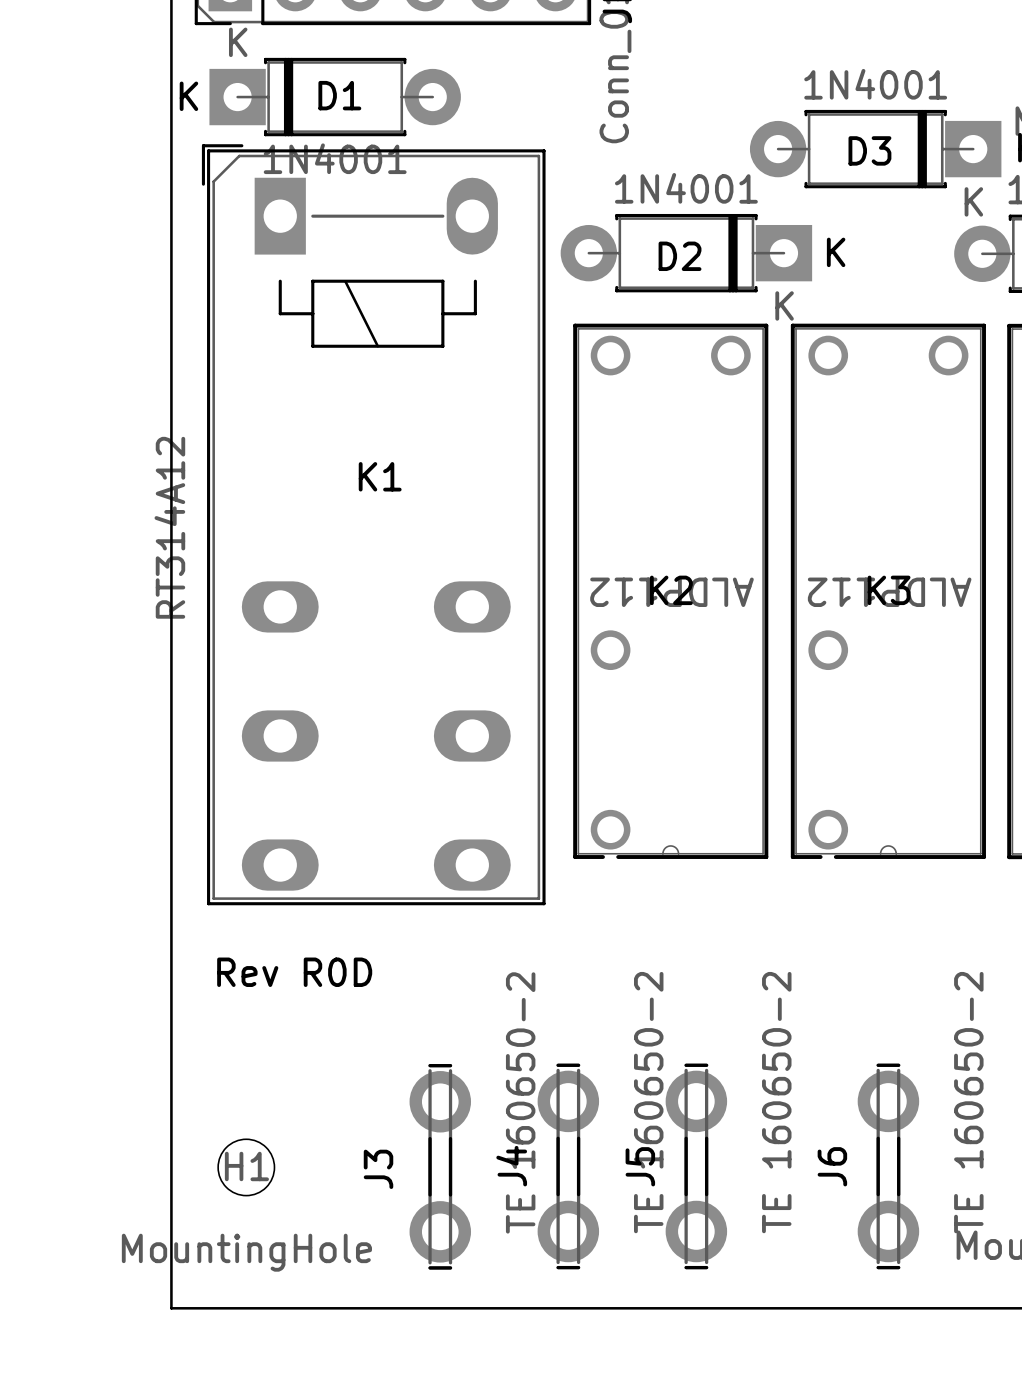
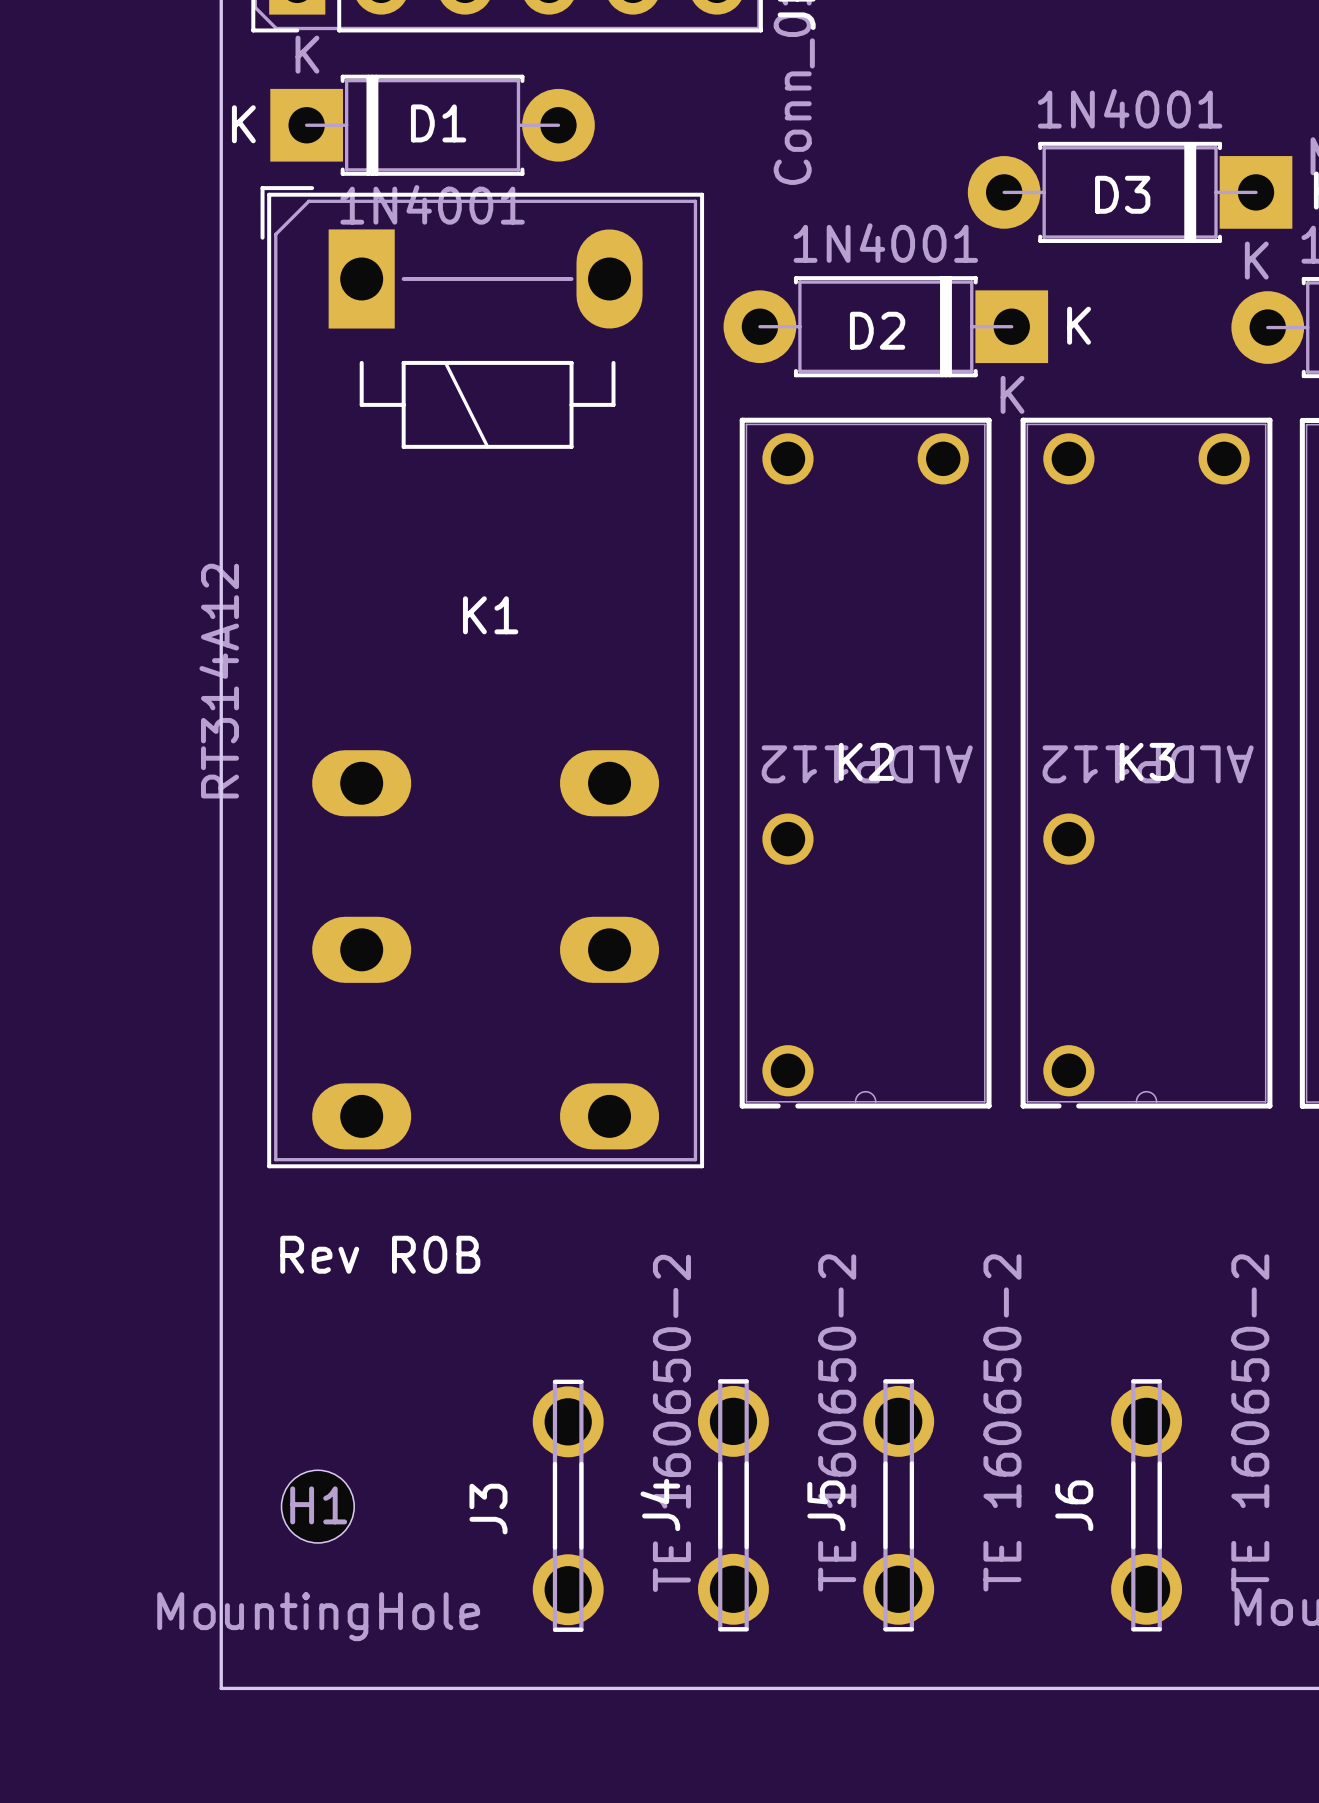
text: Rev R0D (294, 972) -> Rev R0B (380, 1254)
J4 footprint: [537, 1063, 600, 1270] -> [698, 1379, 769, 1632]
J5 footprint: [665, 1063, 728, 1270] -> [863, 1379, 935, 1632]
J6 footprint: [857, 1063, 920, 1270] -> [1111, 1379, 1182, 1632]
J3 footprint: [409, 1064, 472, 1270] -> [532, 1379, 604, 1632]

